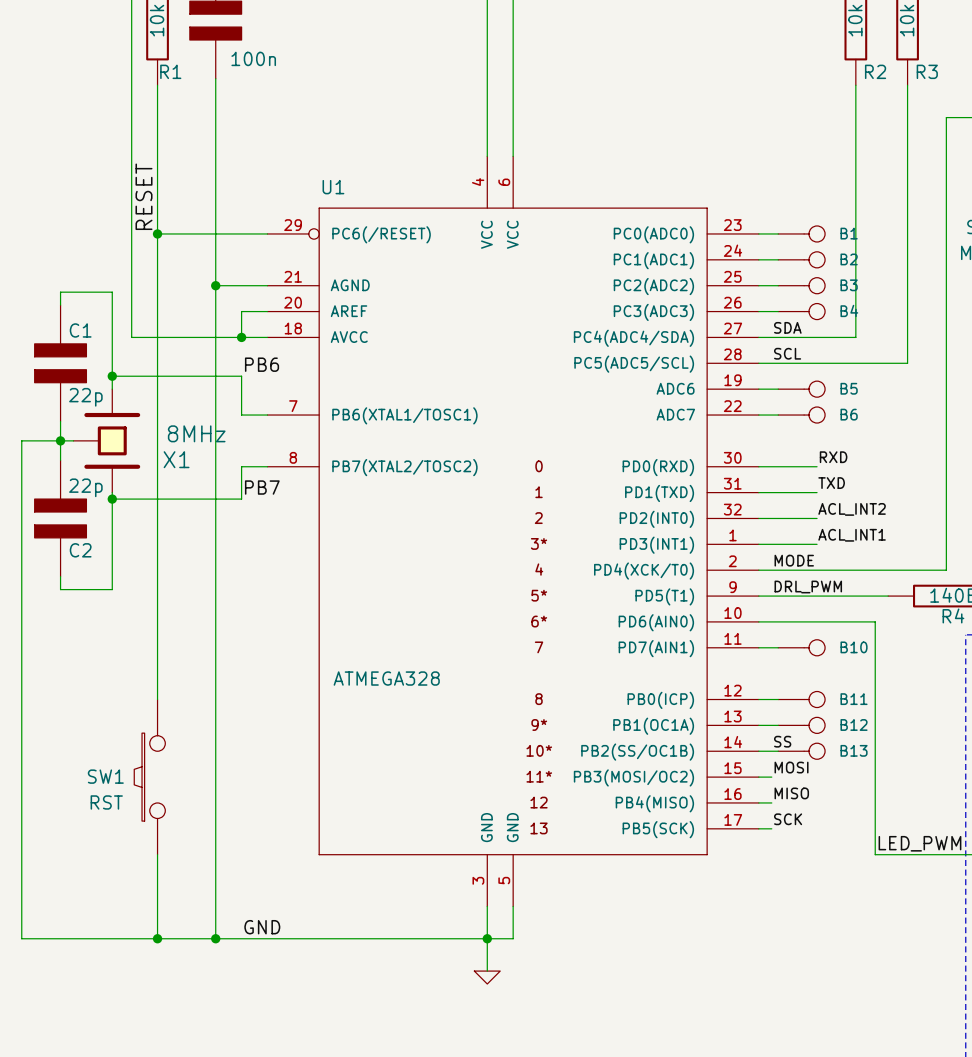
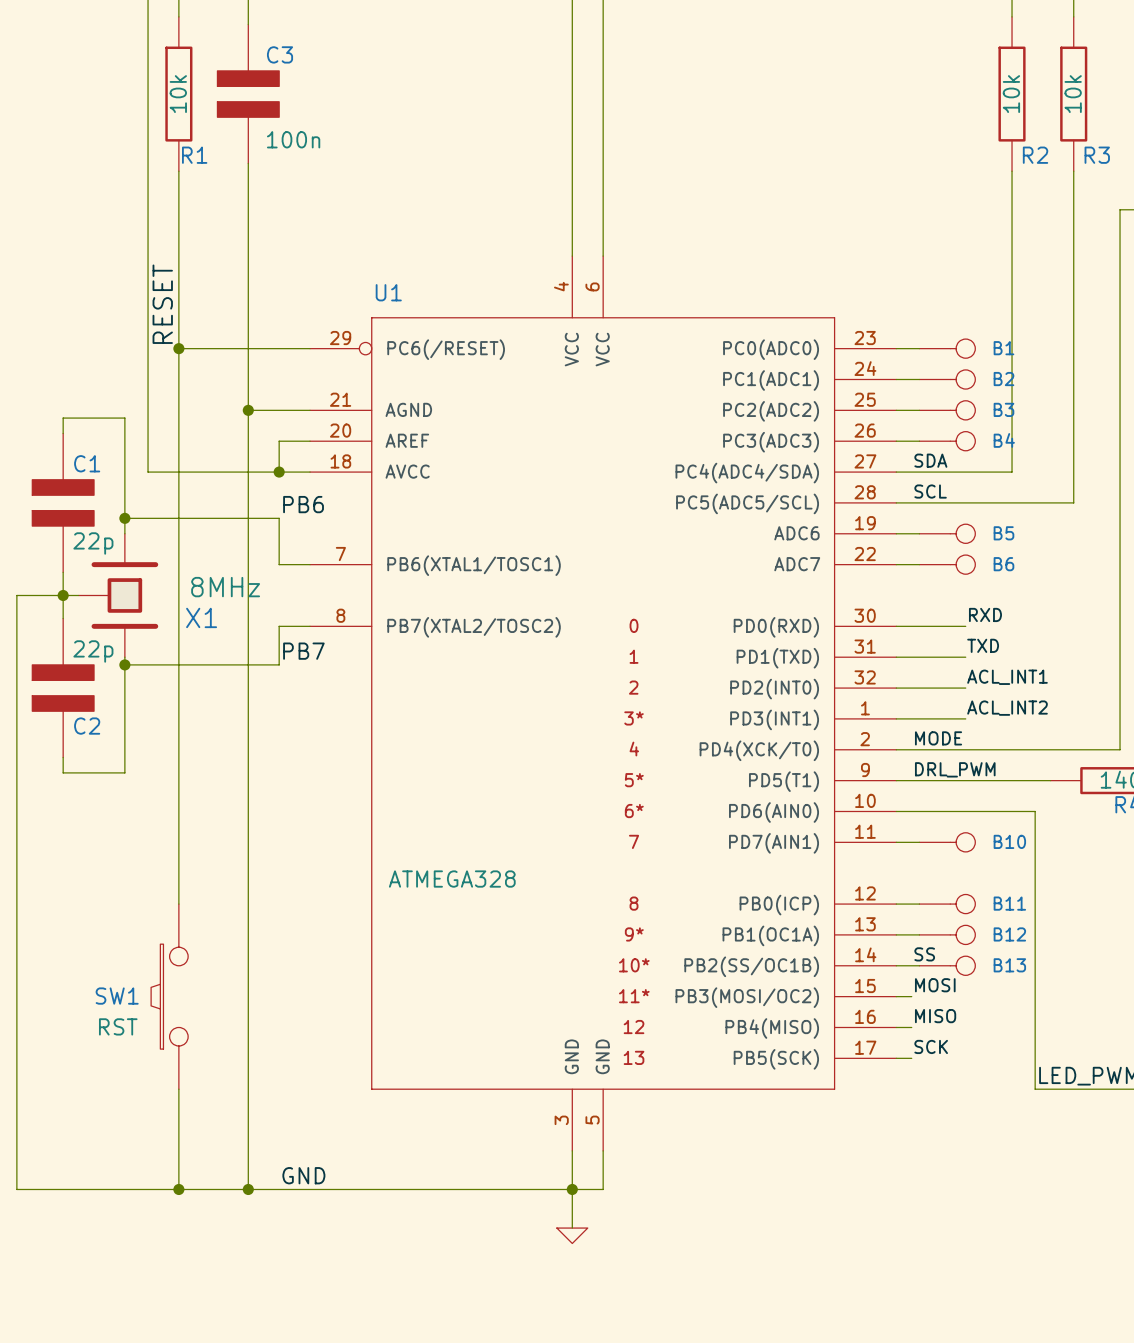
label: ACL_INT2 (852, 509) -> ACL_INT1 (1007, 677)
label: ACL_INT1 (852, 535) -> ACL_INT2 (1007, 708)

